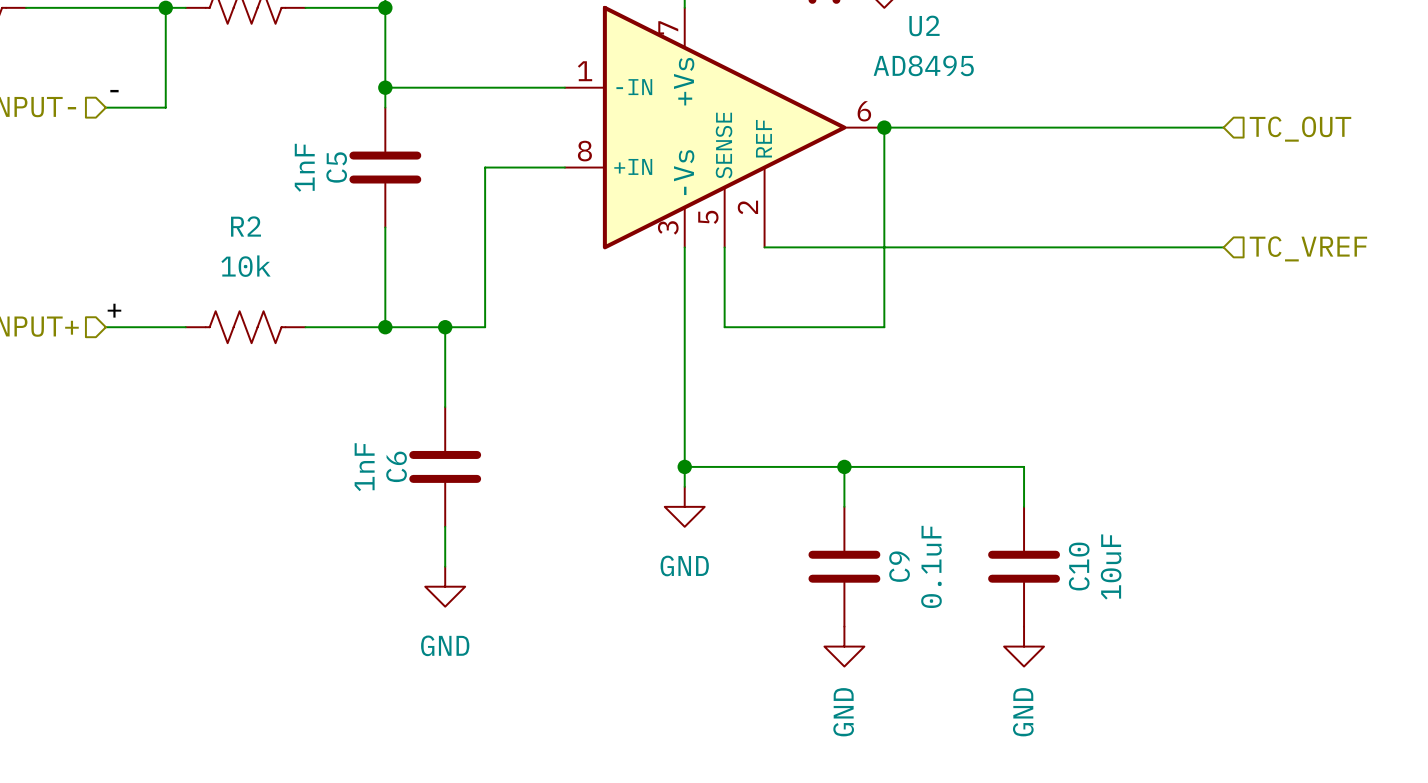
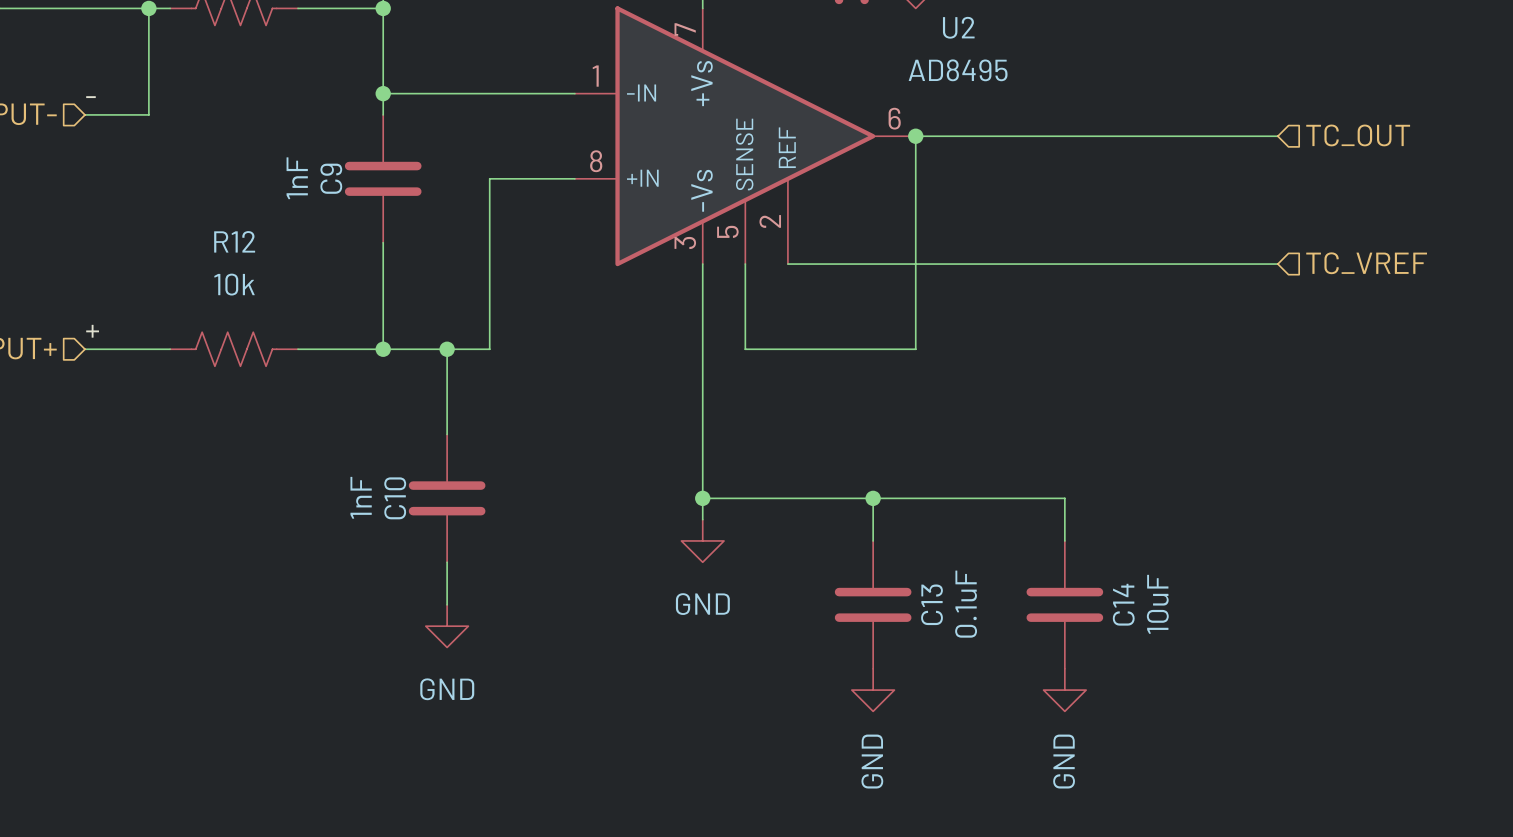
C5 name: C5 (336, 167) -> C9 (331, 178)
R2 name: R2 (245, 226) -> R12 (234, 241)
C6 name: C6 (396, 466) -> C10 (395, 498)
C9 name: C9 (899, 566) -> C13 (932, 604)
C10 name: C10 (1079, 566) -> C14 (1123, 604)

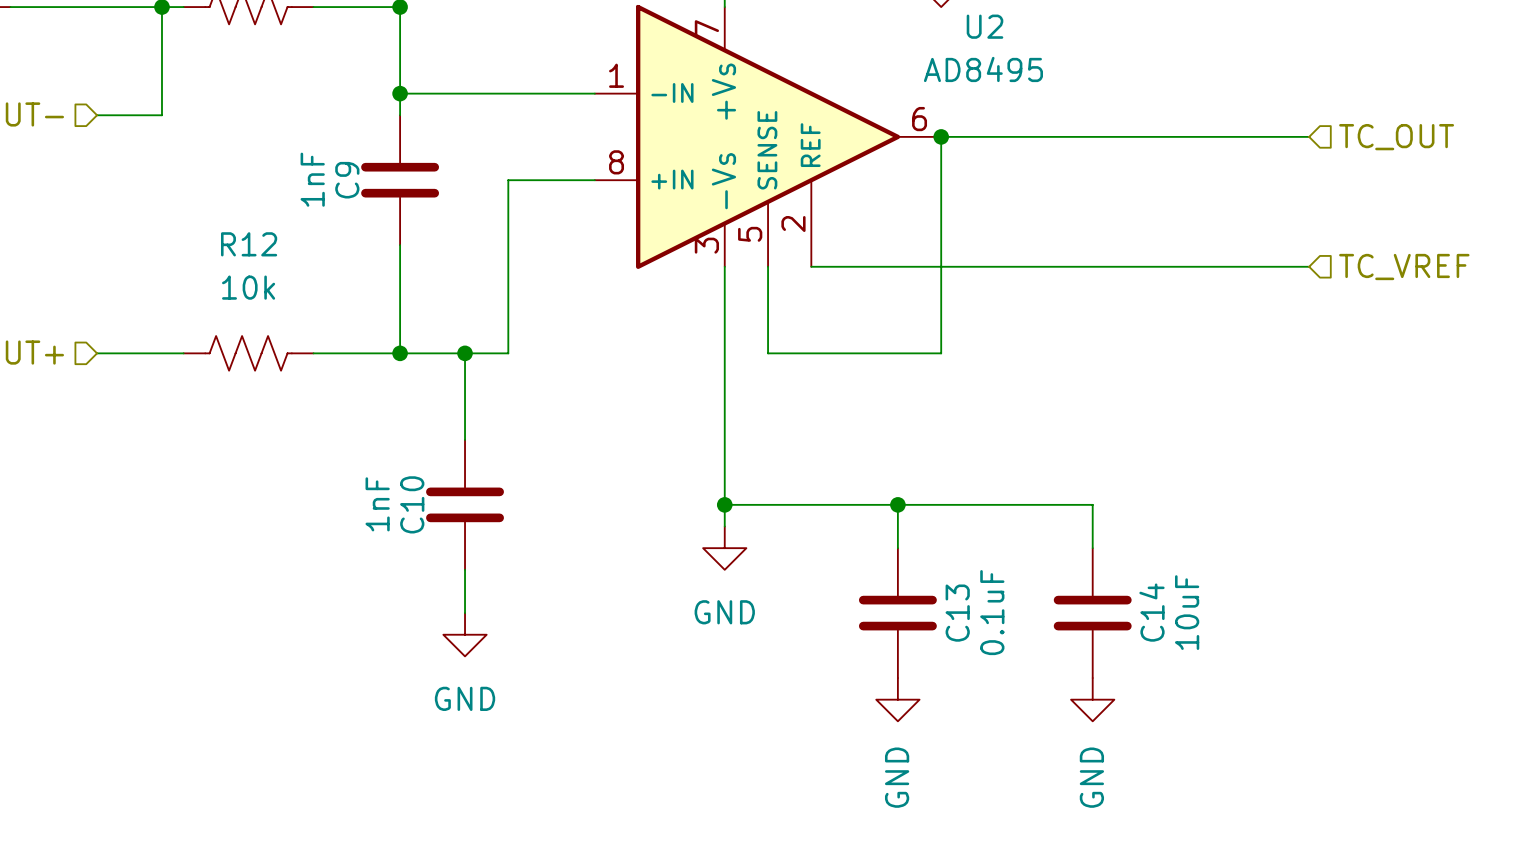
label: - (90, 97) -> none
label: + (92, 331) -> none

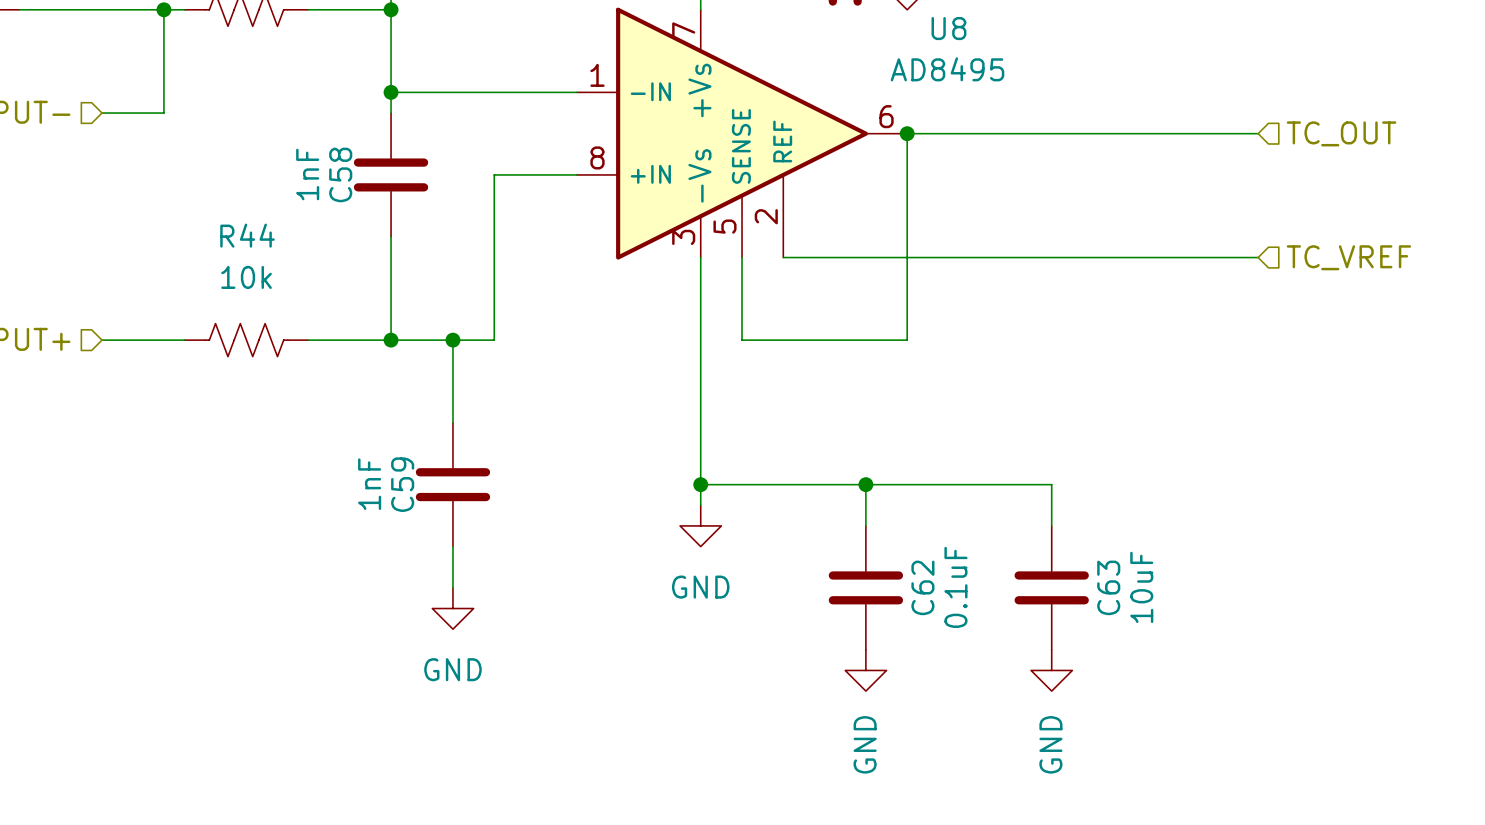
U2 name: U2 (985, 26) -> U8 (948, 28)
C9 name: C9 (347, 180) -> C58 (340, 174)
R12 name: R12 (249, 244) -> R44 (247, 235)
C10 name: C10 (412, 504) -> C59 (402, 484)
C14 name: C14 (1151, 612) -> C63 (1108, 587)
C13 name: C13 (957, 613) -> C62 (922, 587)

